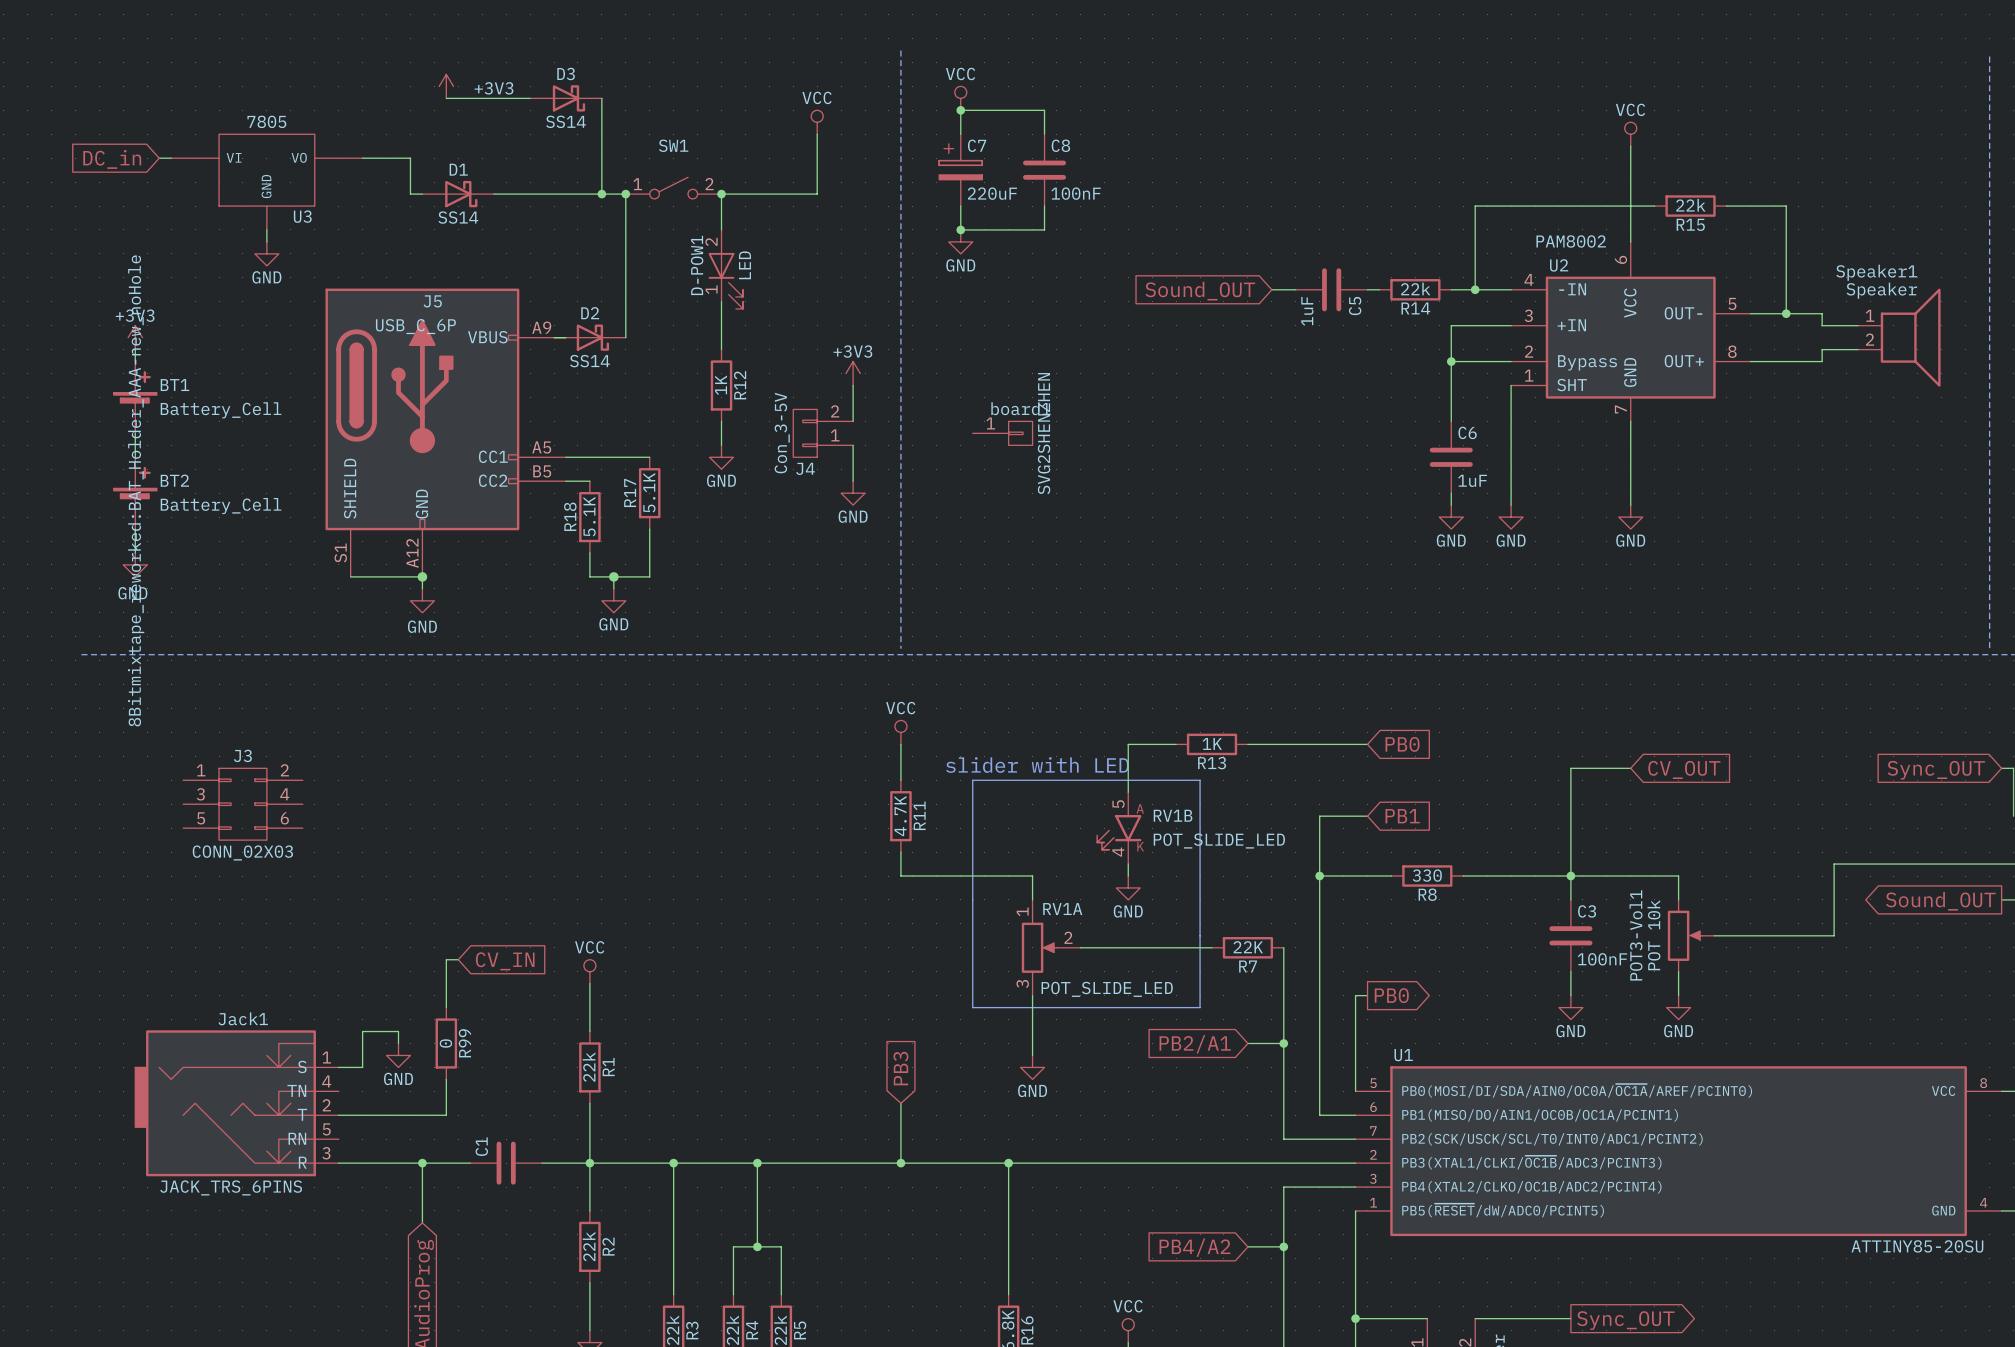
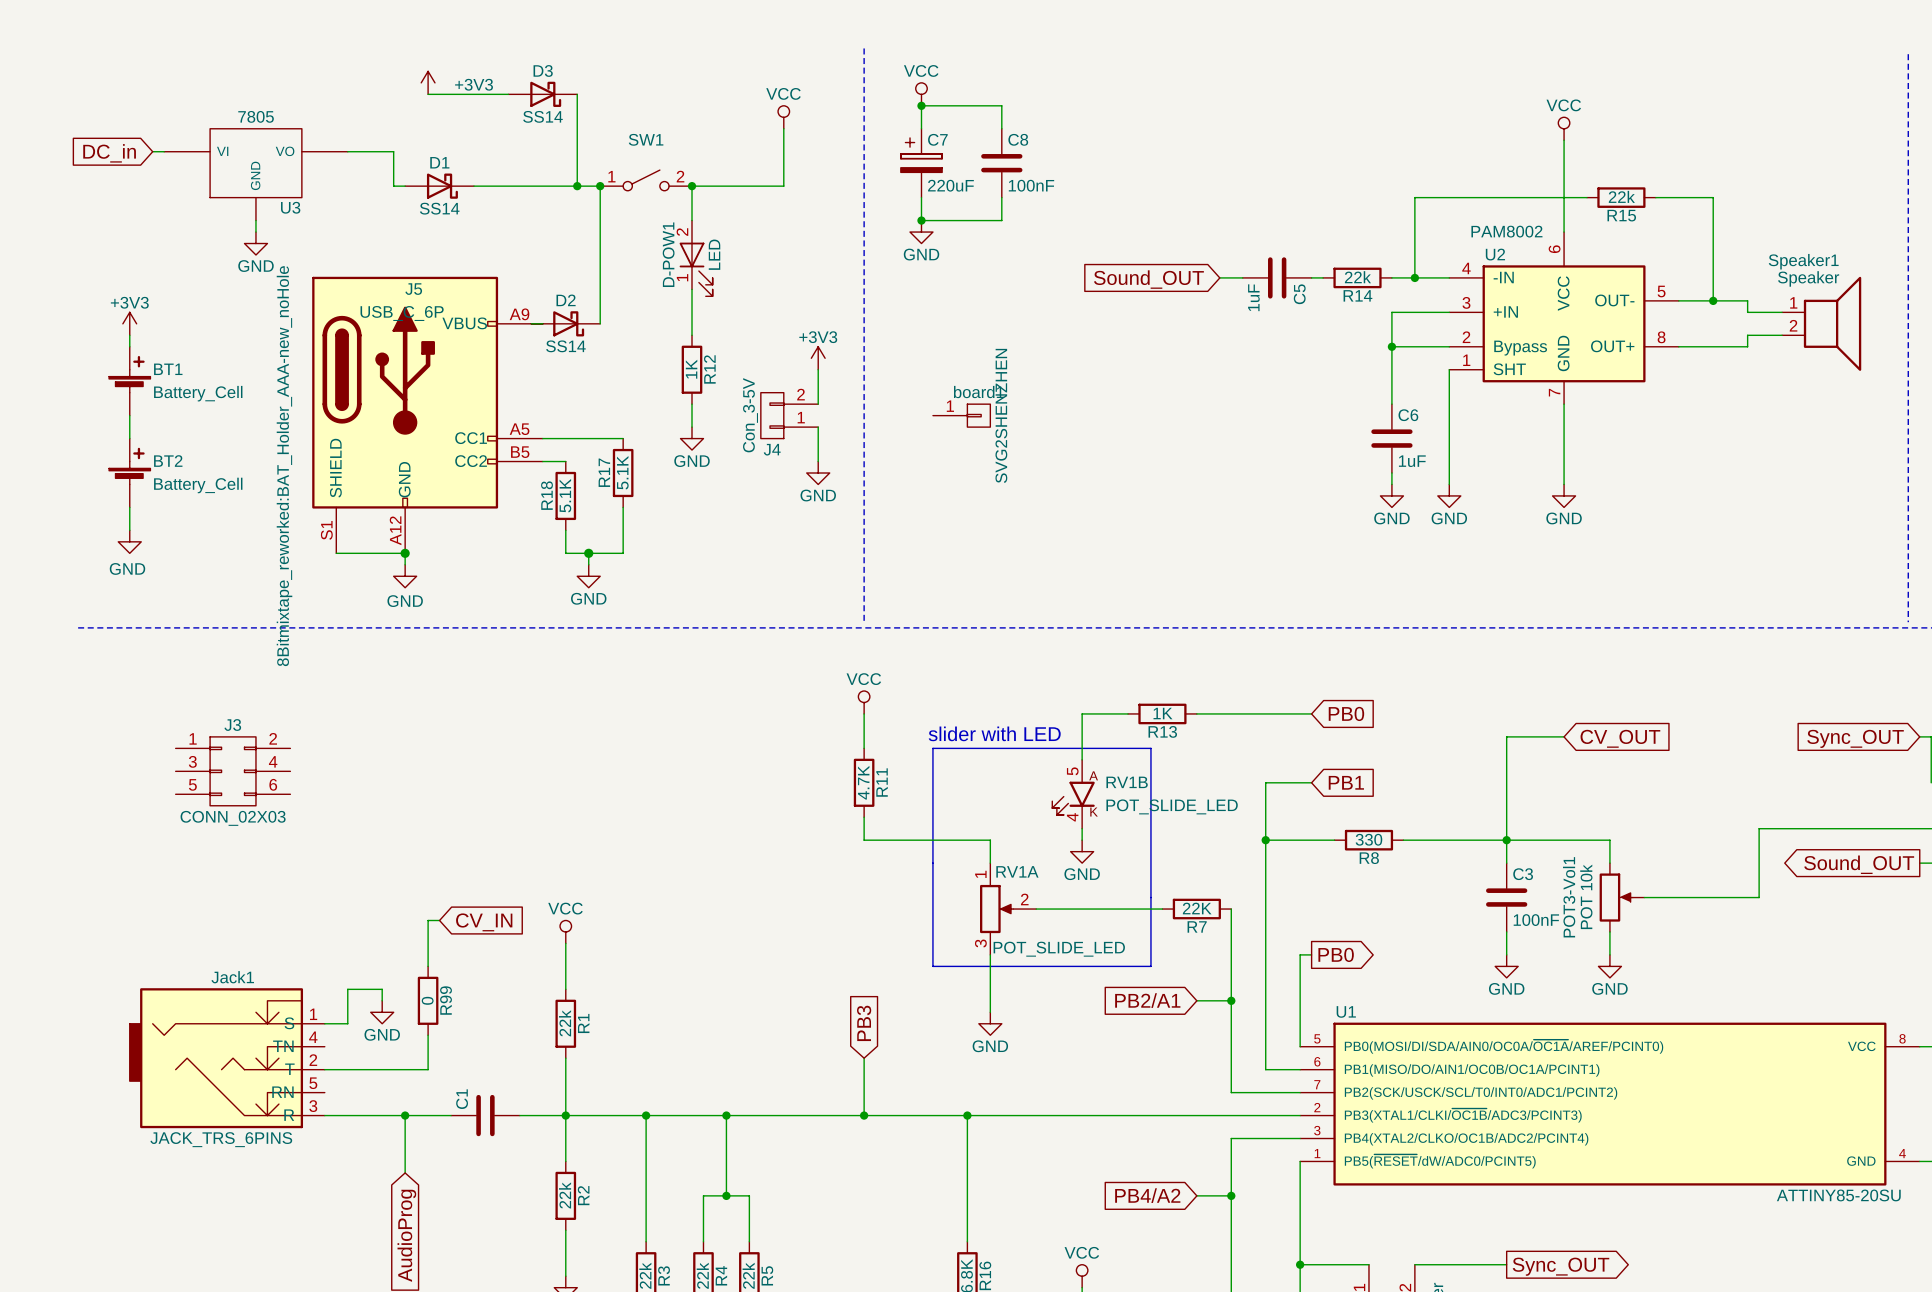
BT2 text position: 8Bitmixtape_reworked:BAT_Holder_AAA-new_noHole (136, 490) -> 8Bitmixtape_reworked:BAT_Holder_AAA-new_noHole (284, 466)

